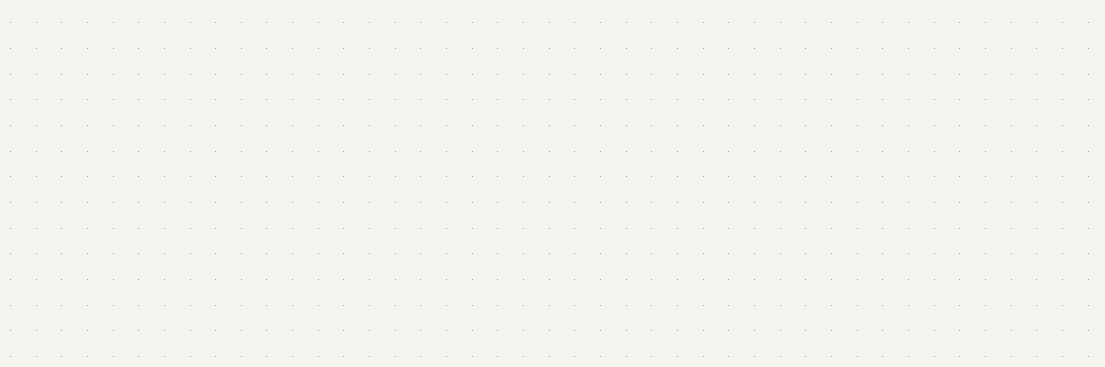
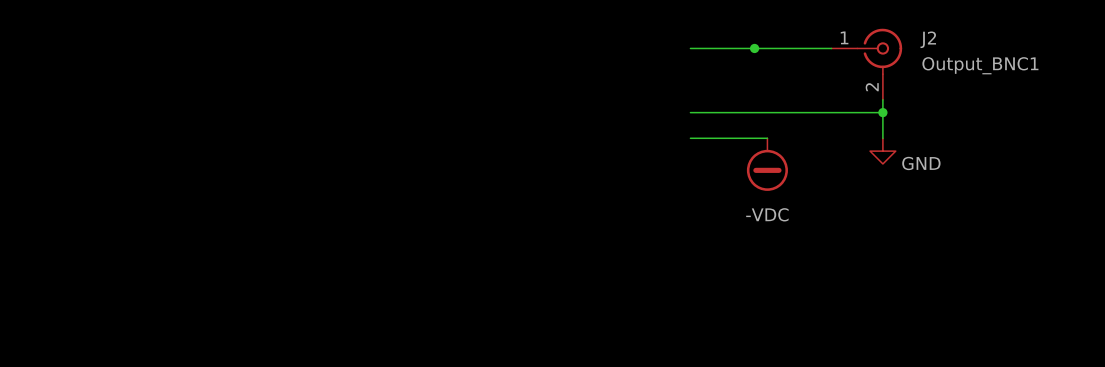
wire: none -> (690, 48) (831, 48)
junction: none -> (754, 48)
J2: none -> Output_BNC1 (866, 64)
wire: none -> (882, 99) (882, 138)
wire: none -> (690, 112) (882, 112)
junction: none -> (882, 112)
wire: none -> (690, 138) (767, 138)
power symbol: none -> GND (882, 151)
power symbol: none -> -VDC (767, 164)

